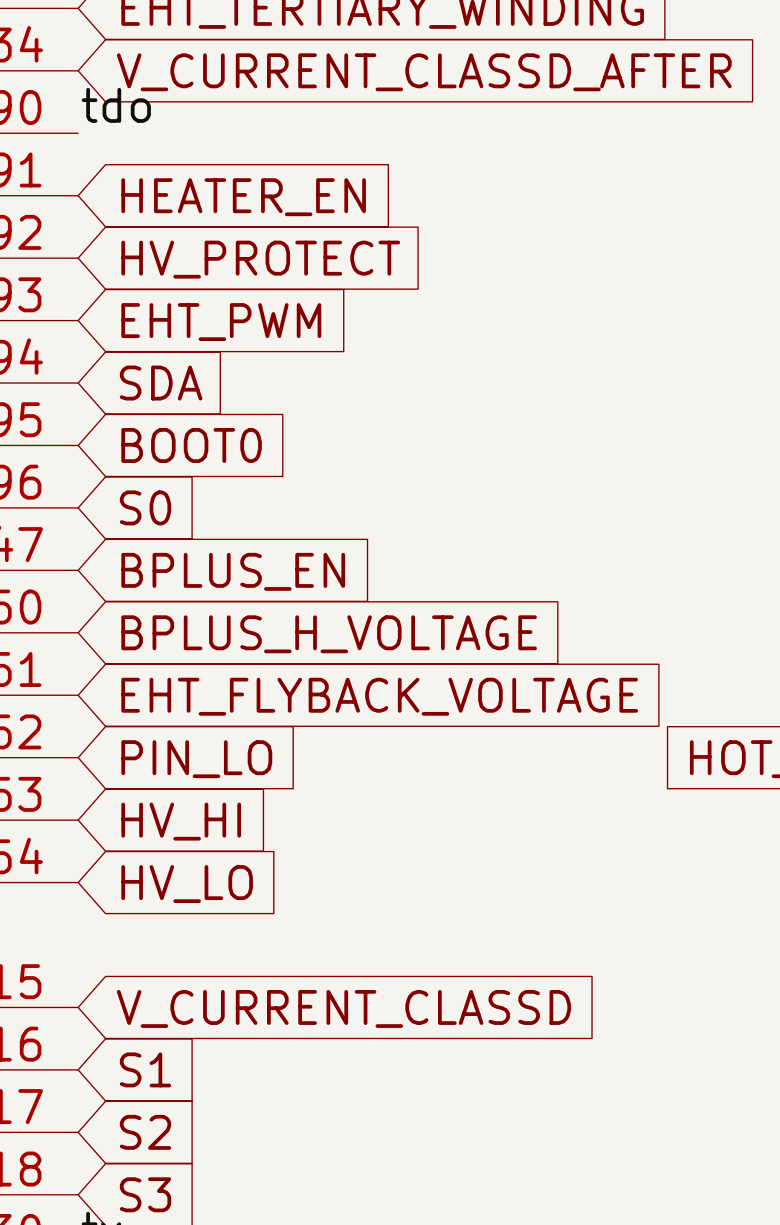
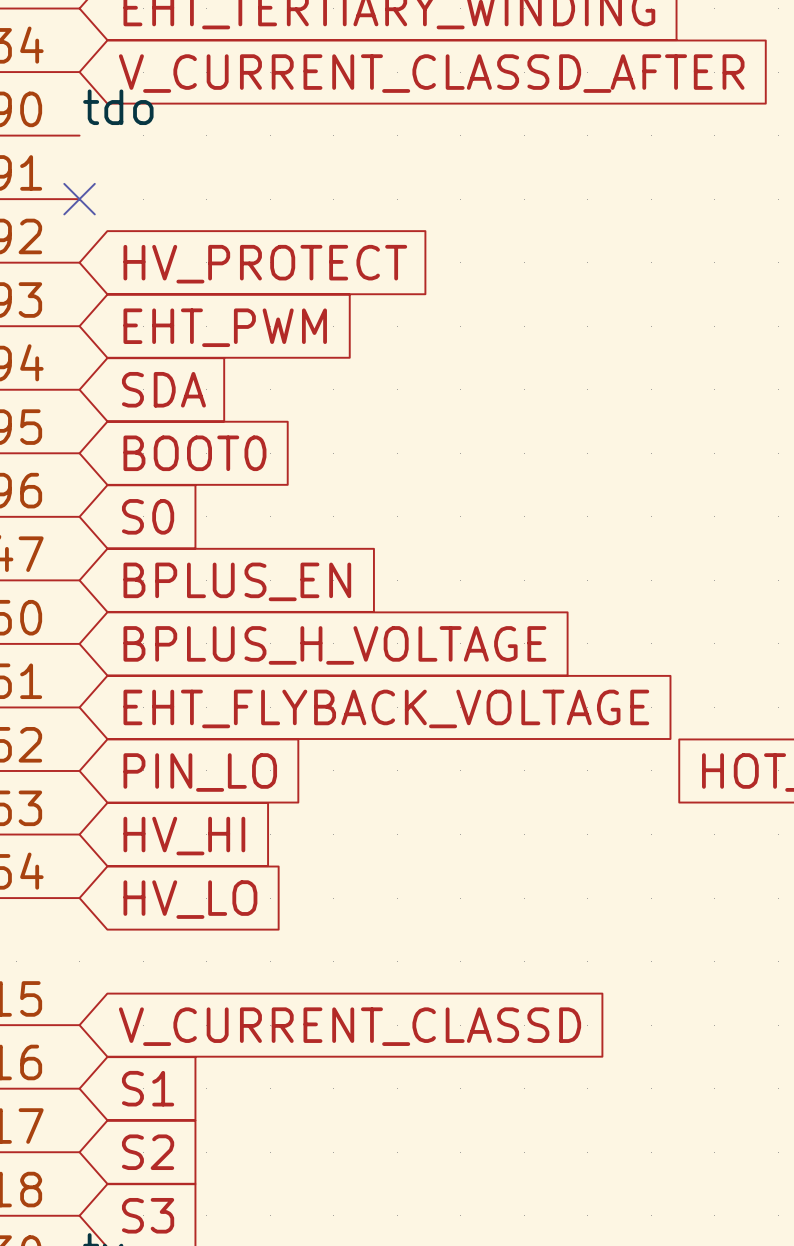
no-connect mark: none -> (79, 199)
global label: HEATER_EN (243, 197) -> none

